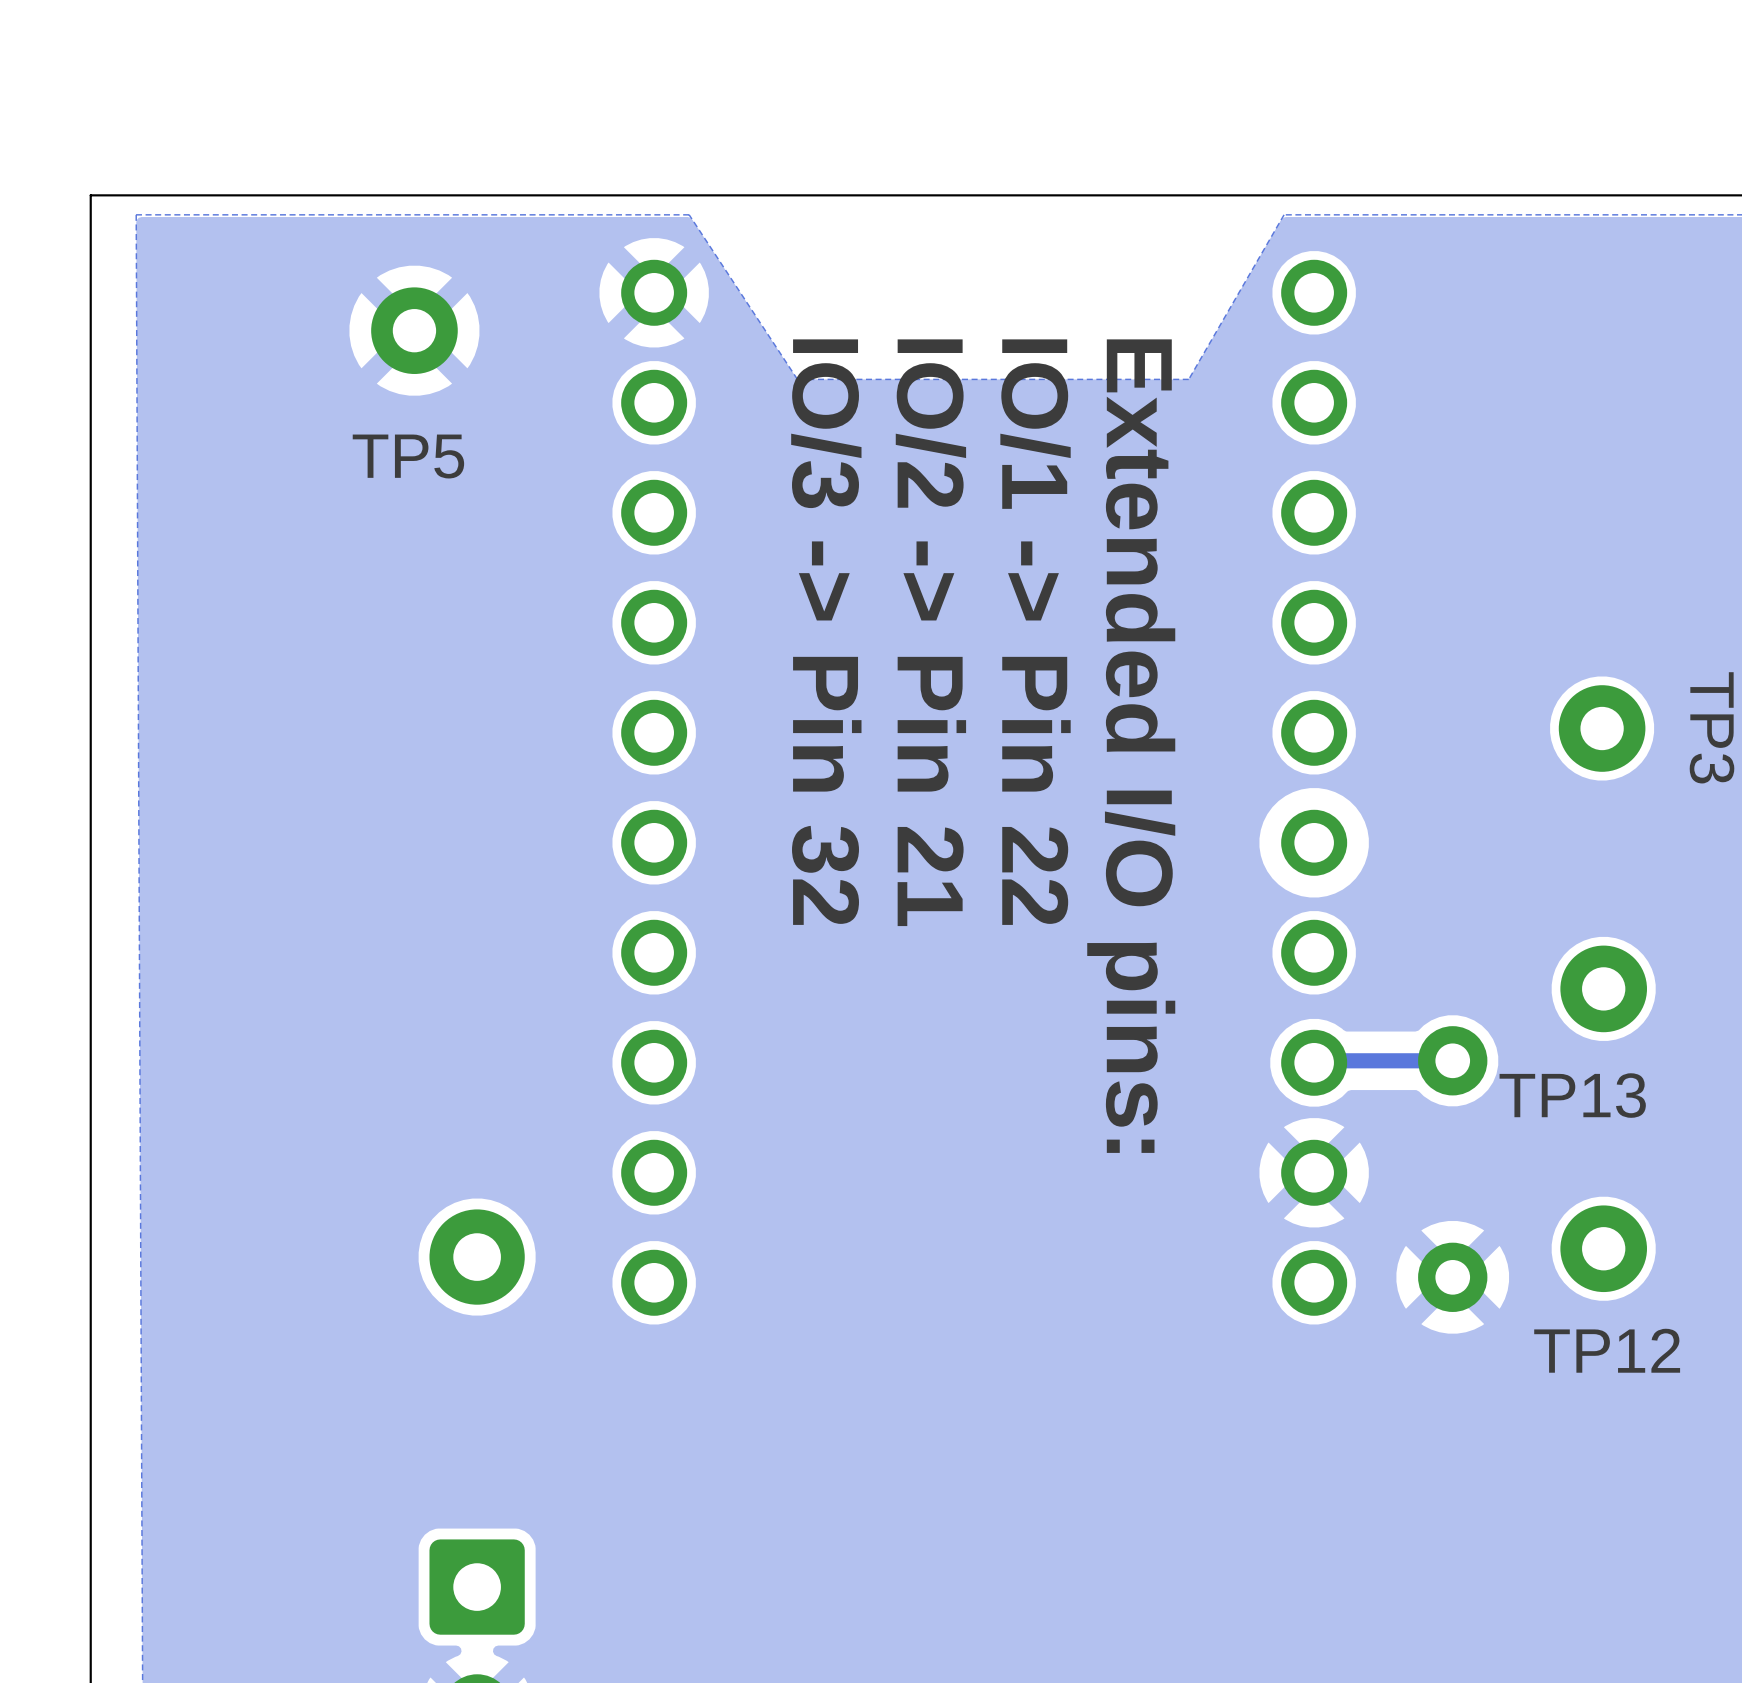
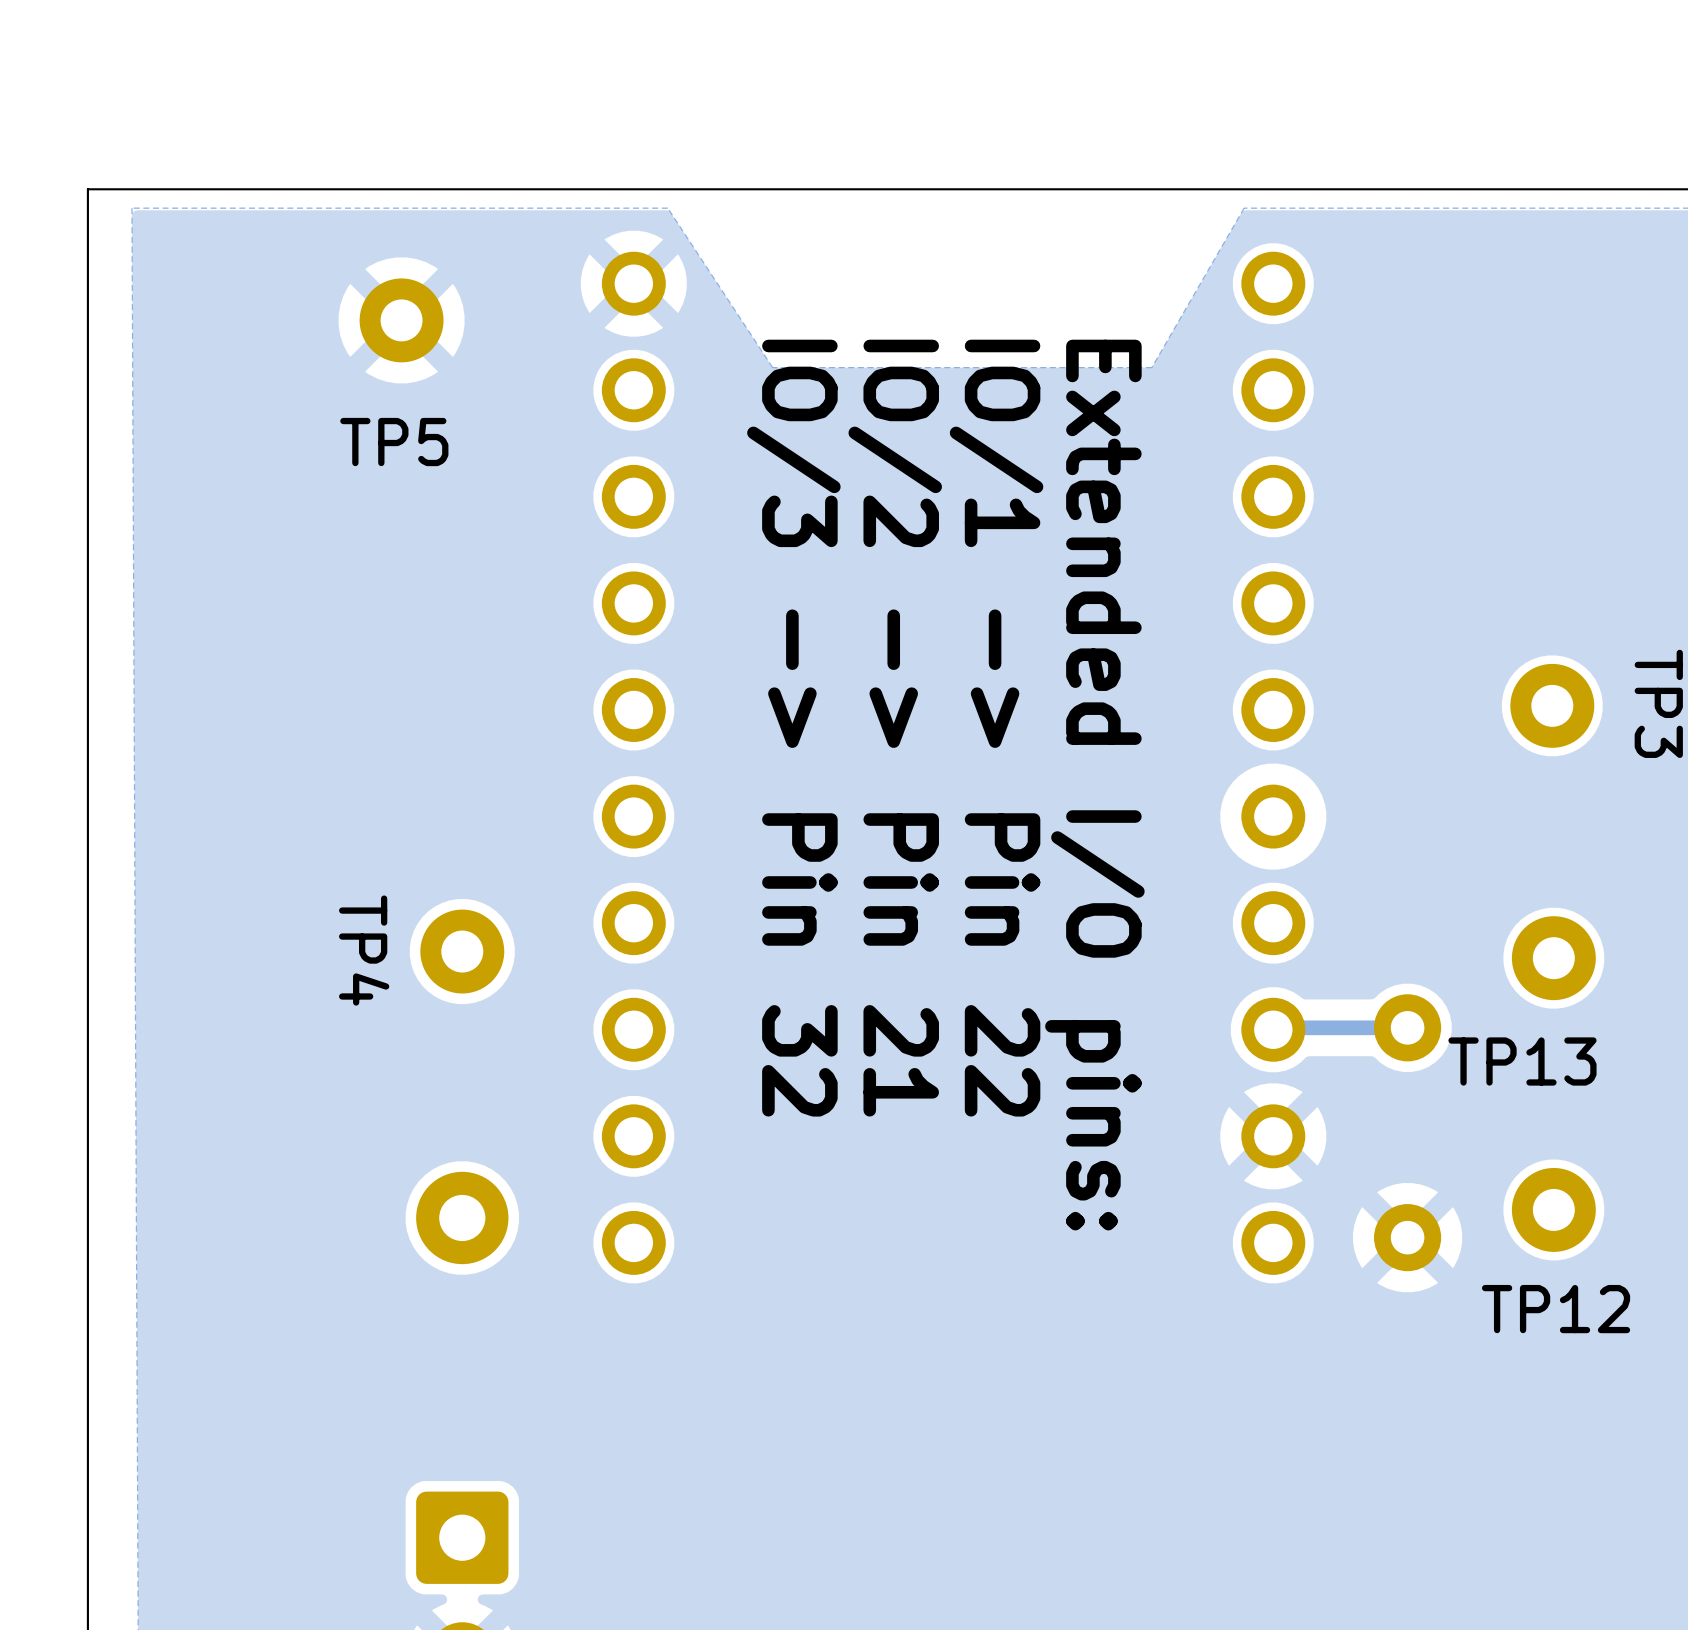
TP4: none -> (462, 951)

